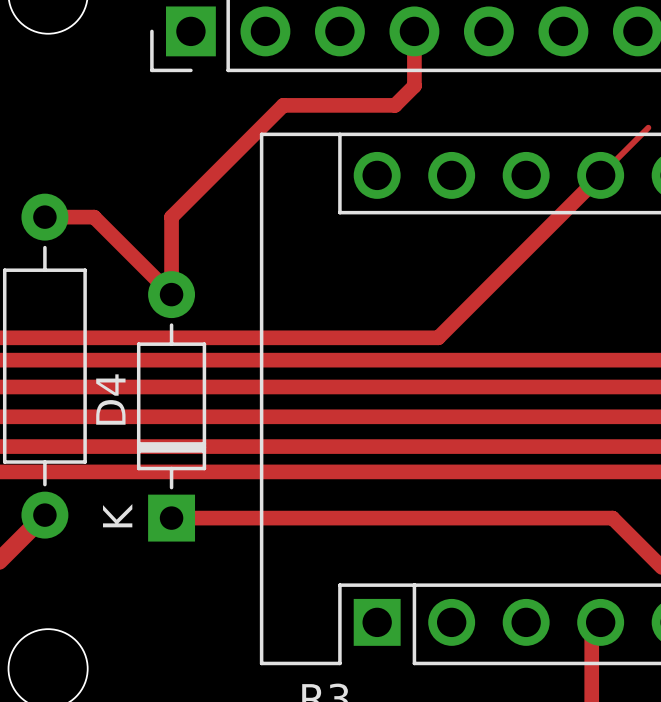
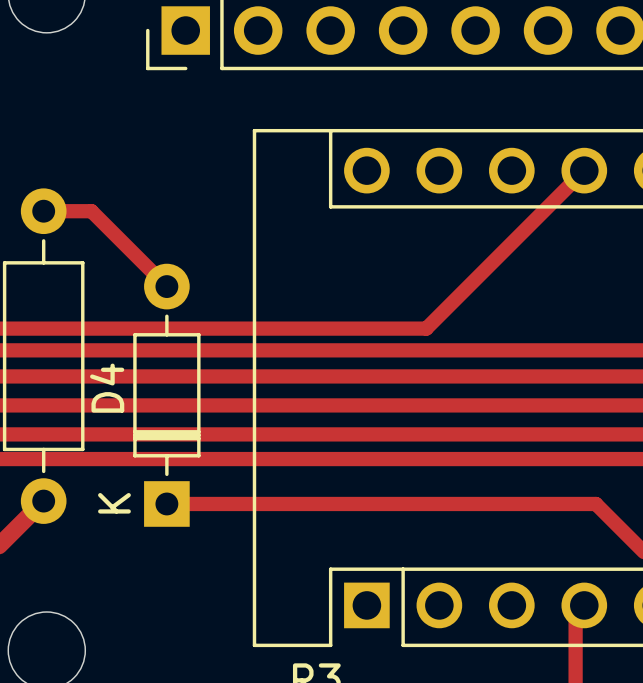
track: (414, 31) (414, 86) (395, 105) (283, 105) (171, 217) (171, 294) -> none
track: (648, 127) (600, 175) -> none

